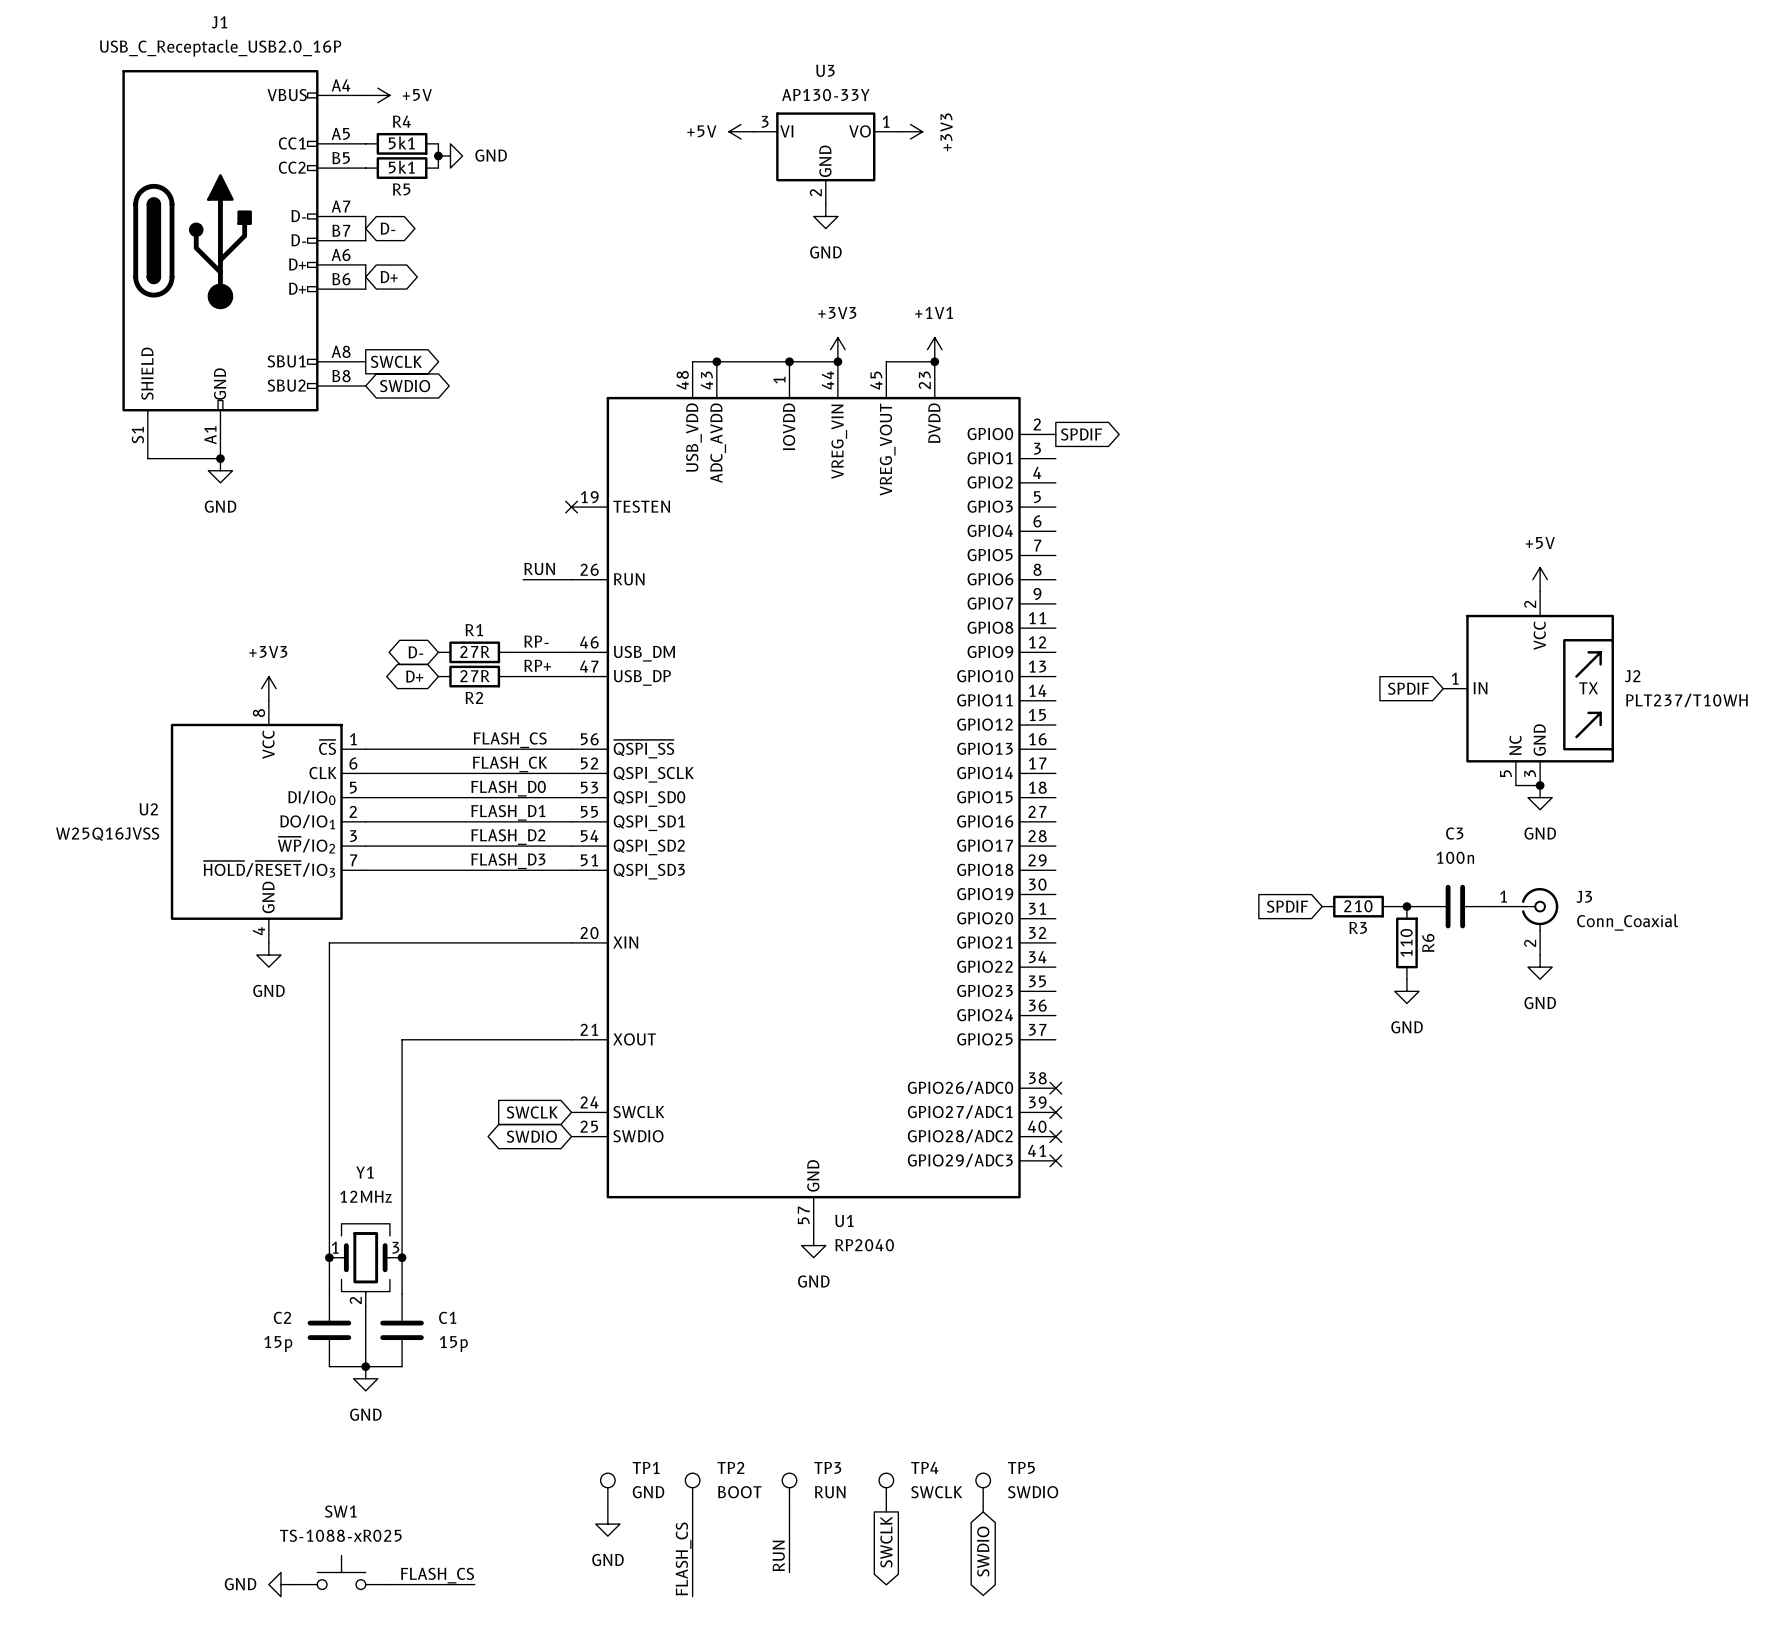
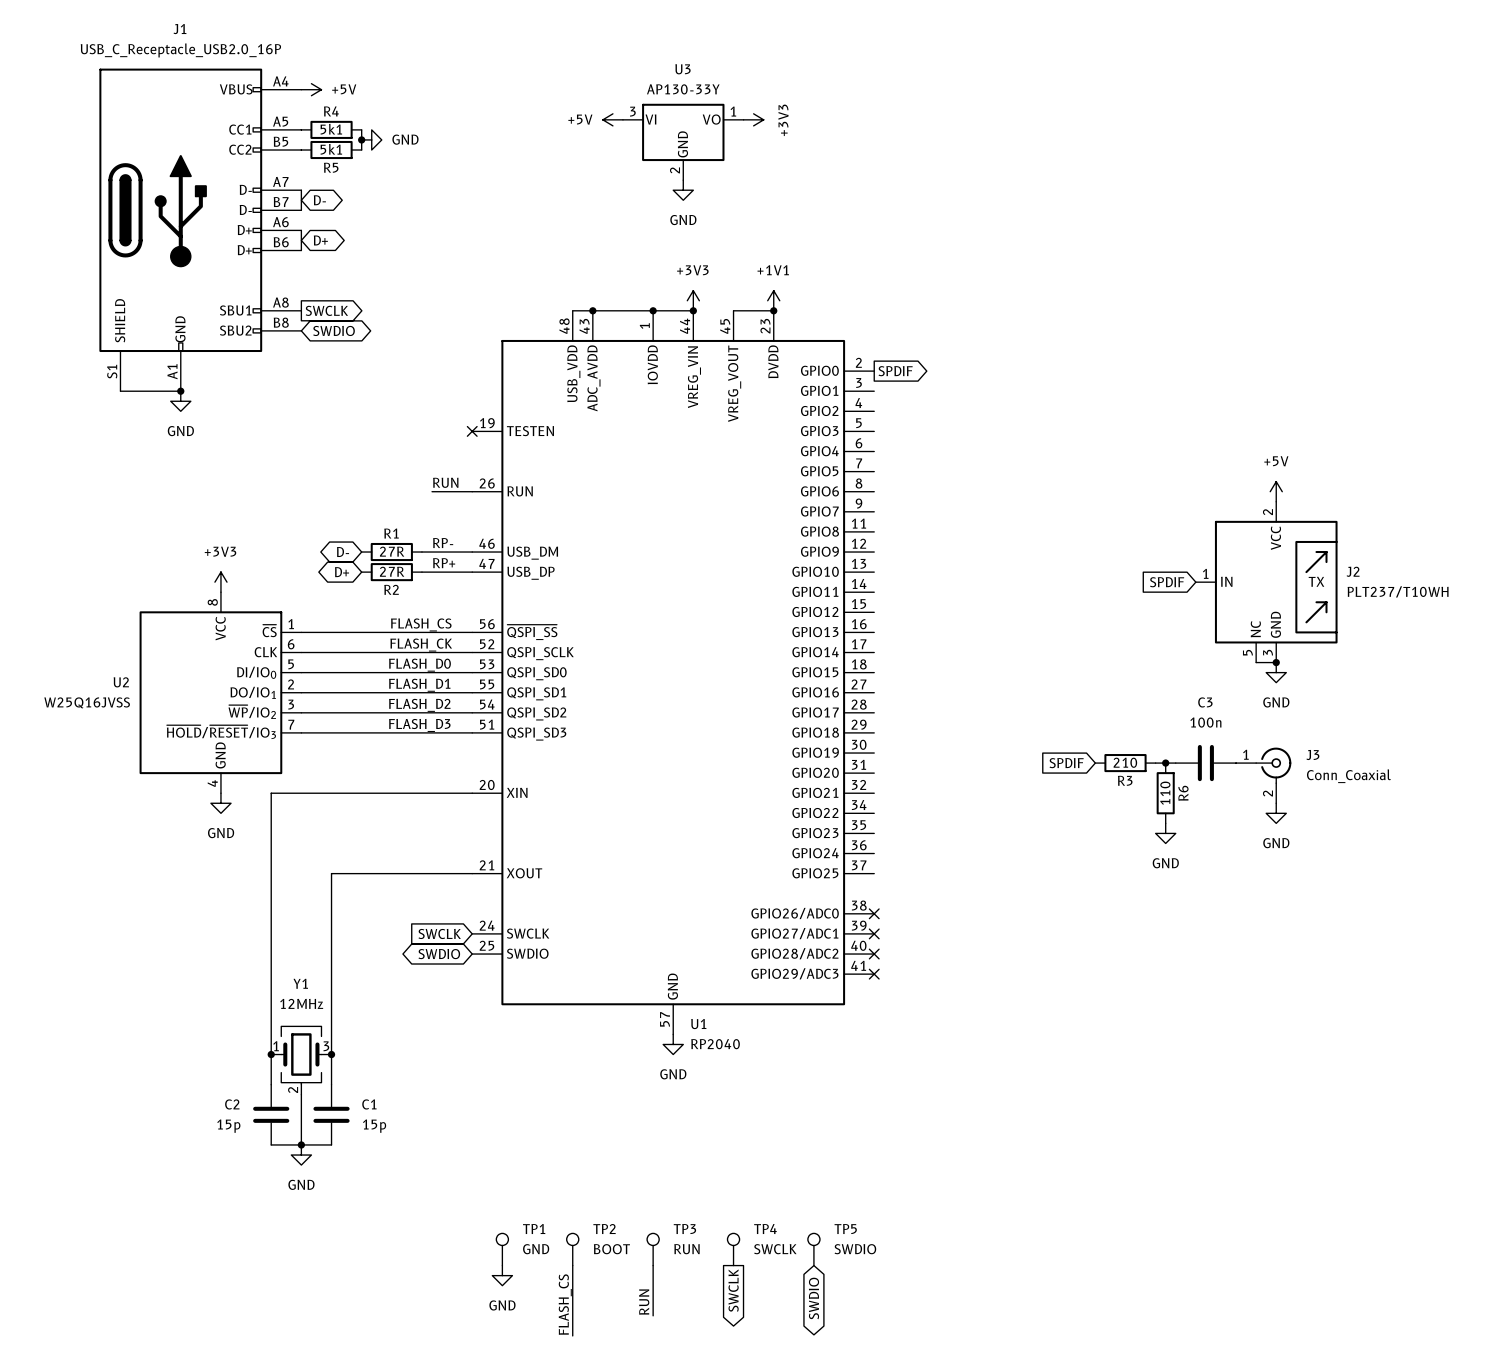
SW1: TS-1088-xR025 (341, 1572) -> none
label: FLASH_CS (437, 1575) -> none
power symbol: GND (280, 1584) -> none
wire: (389, 1584) (474, 1584) -> none

